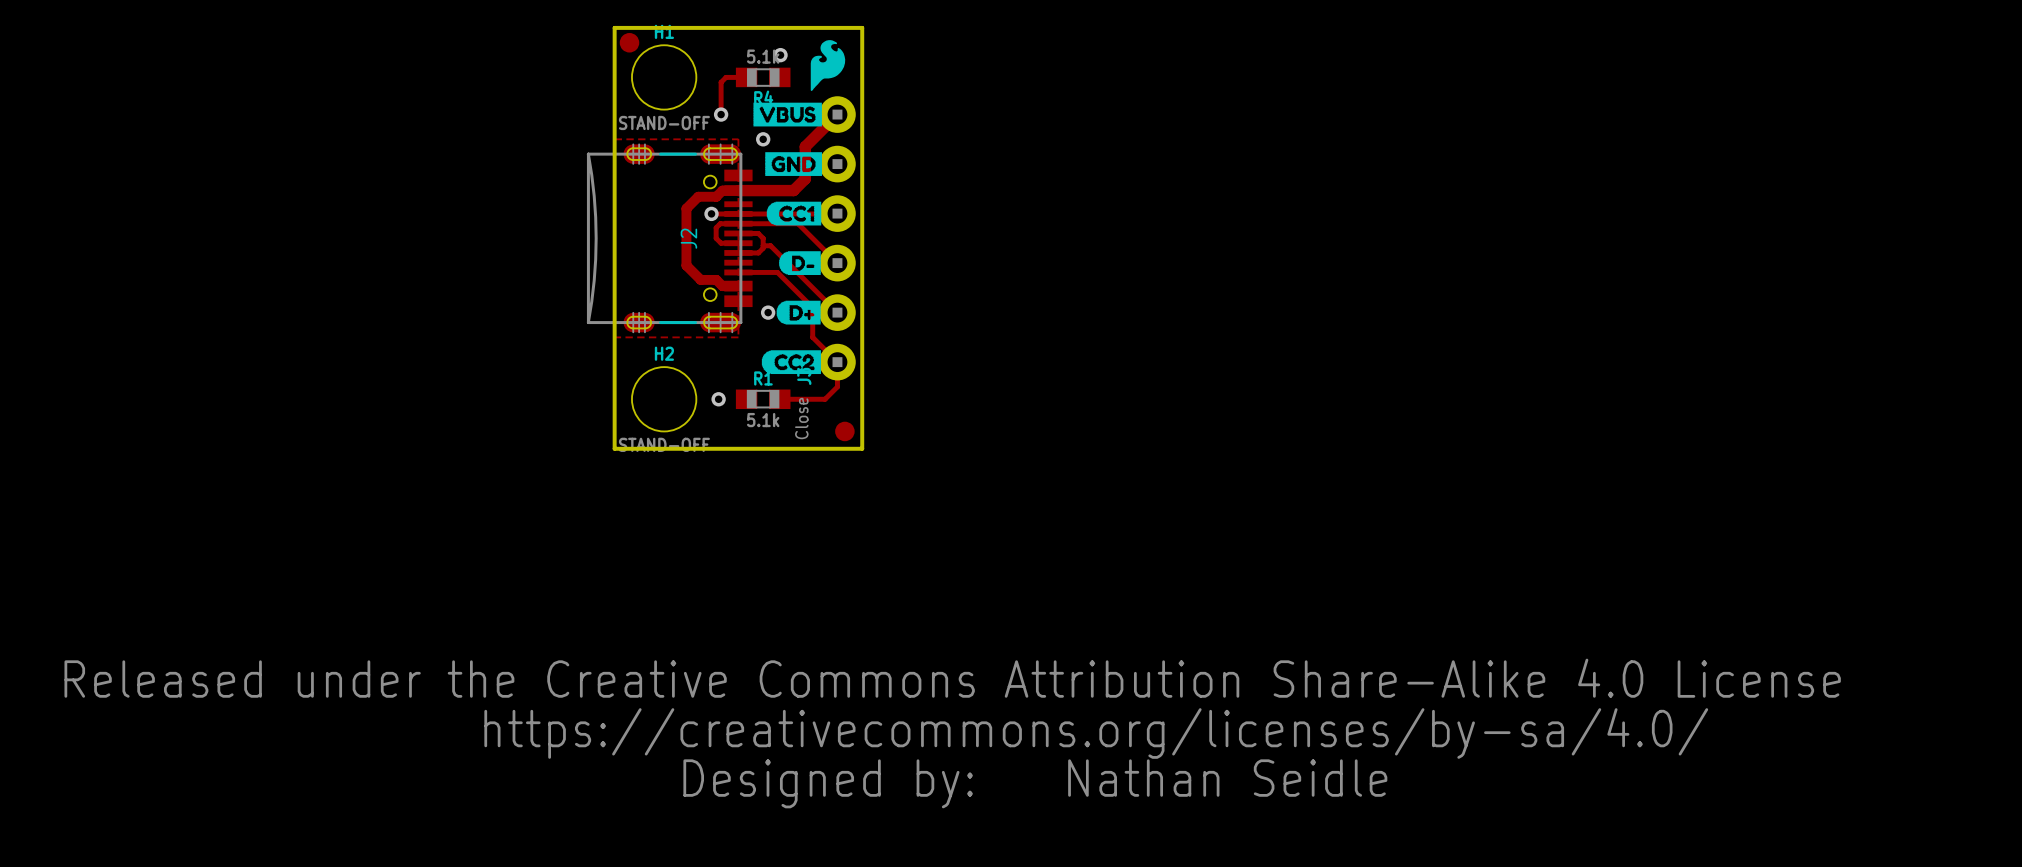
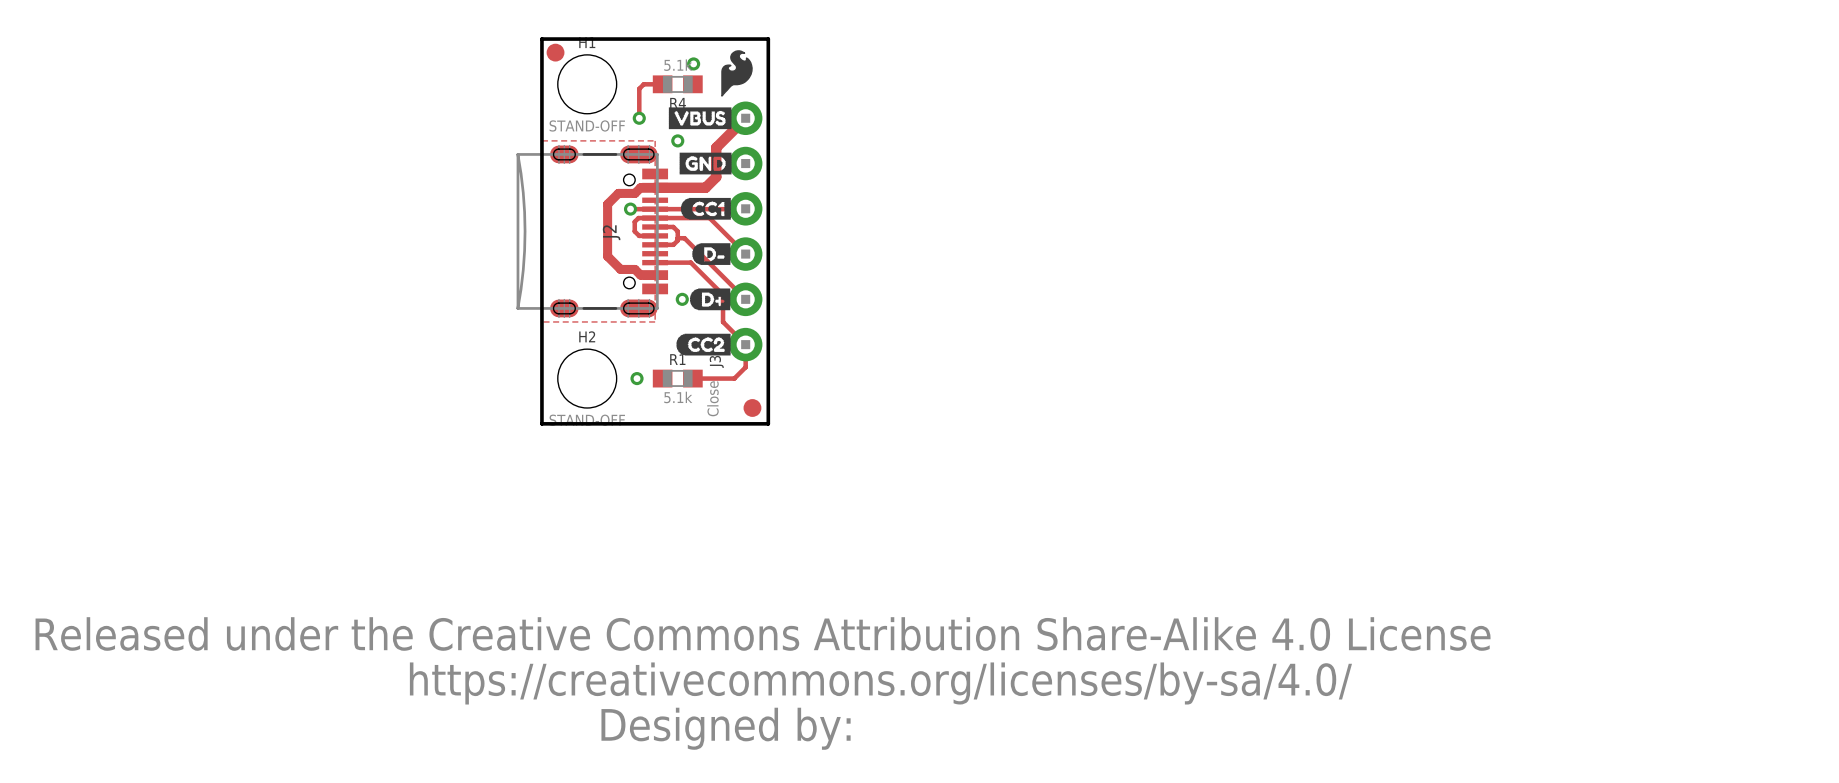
text: Nathan Seidle (1227, 778) -> none

